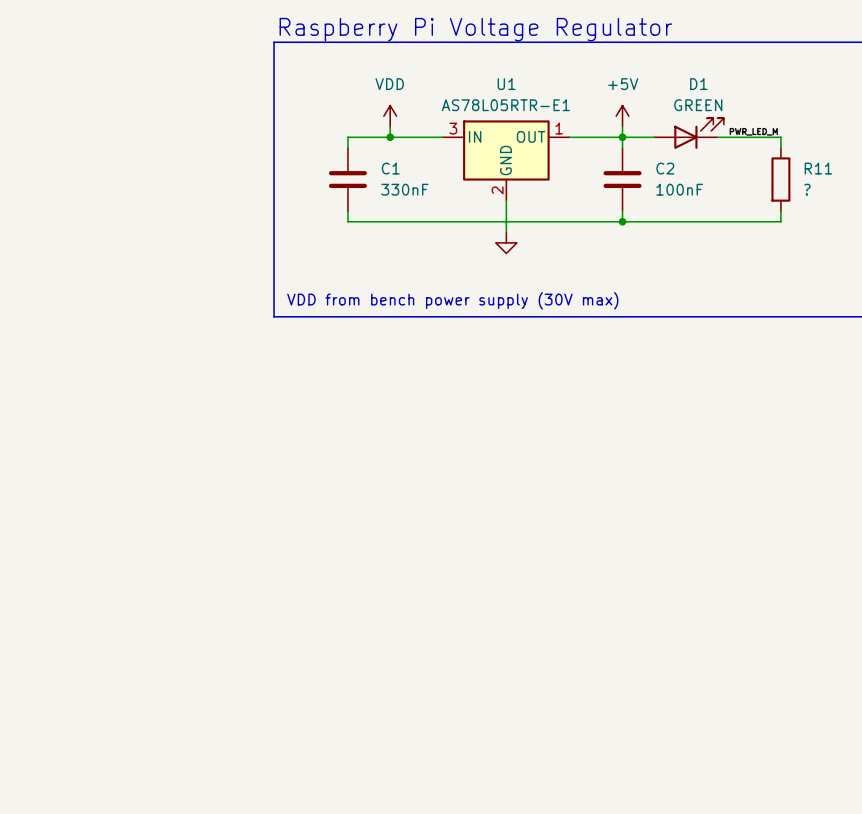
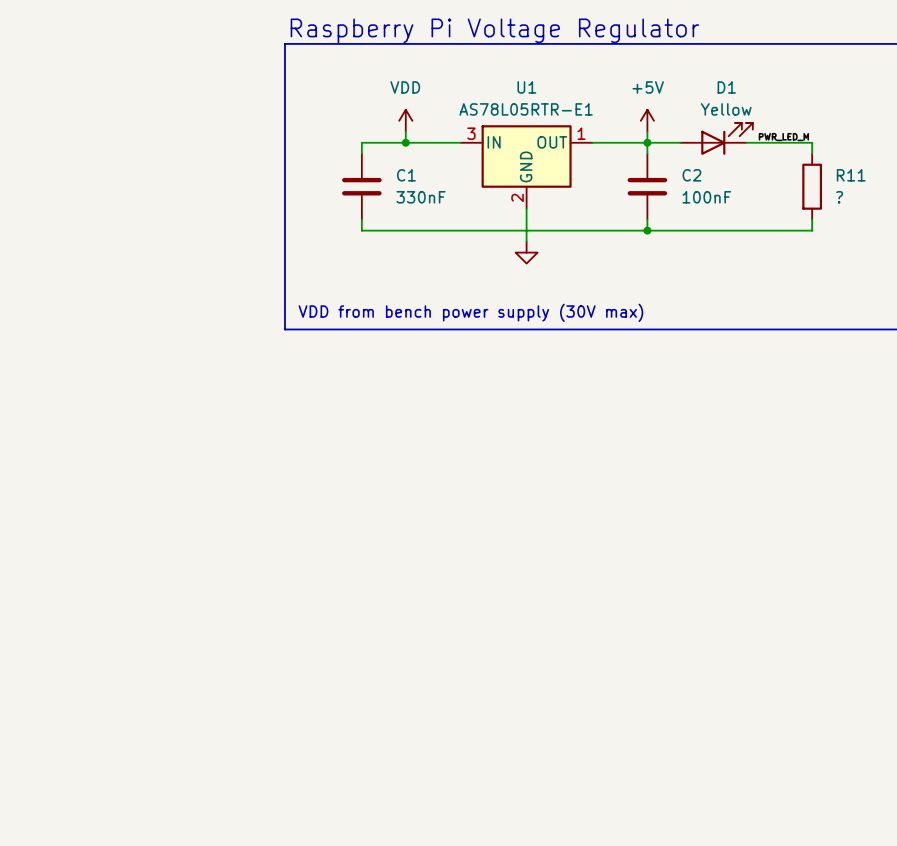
D1 value: GREEN (698, 105) -> Yellow (726, 109)

